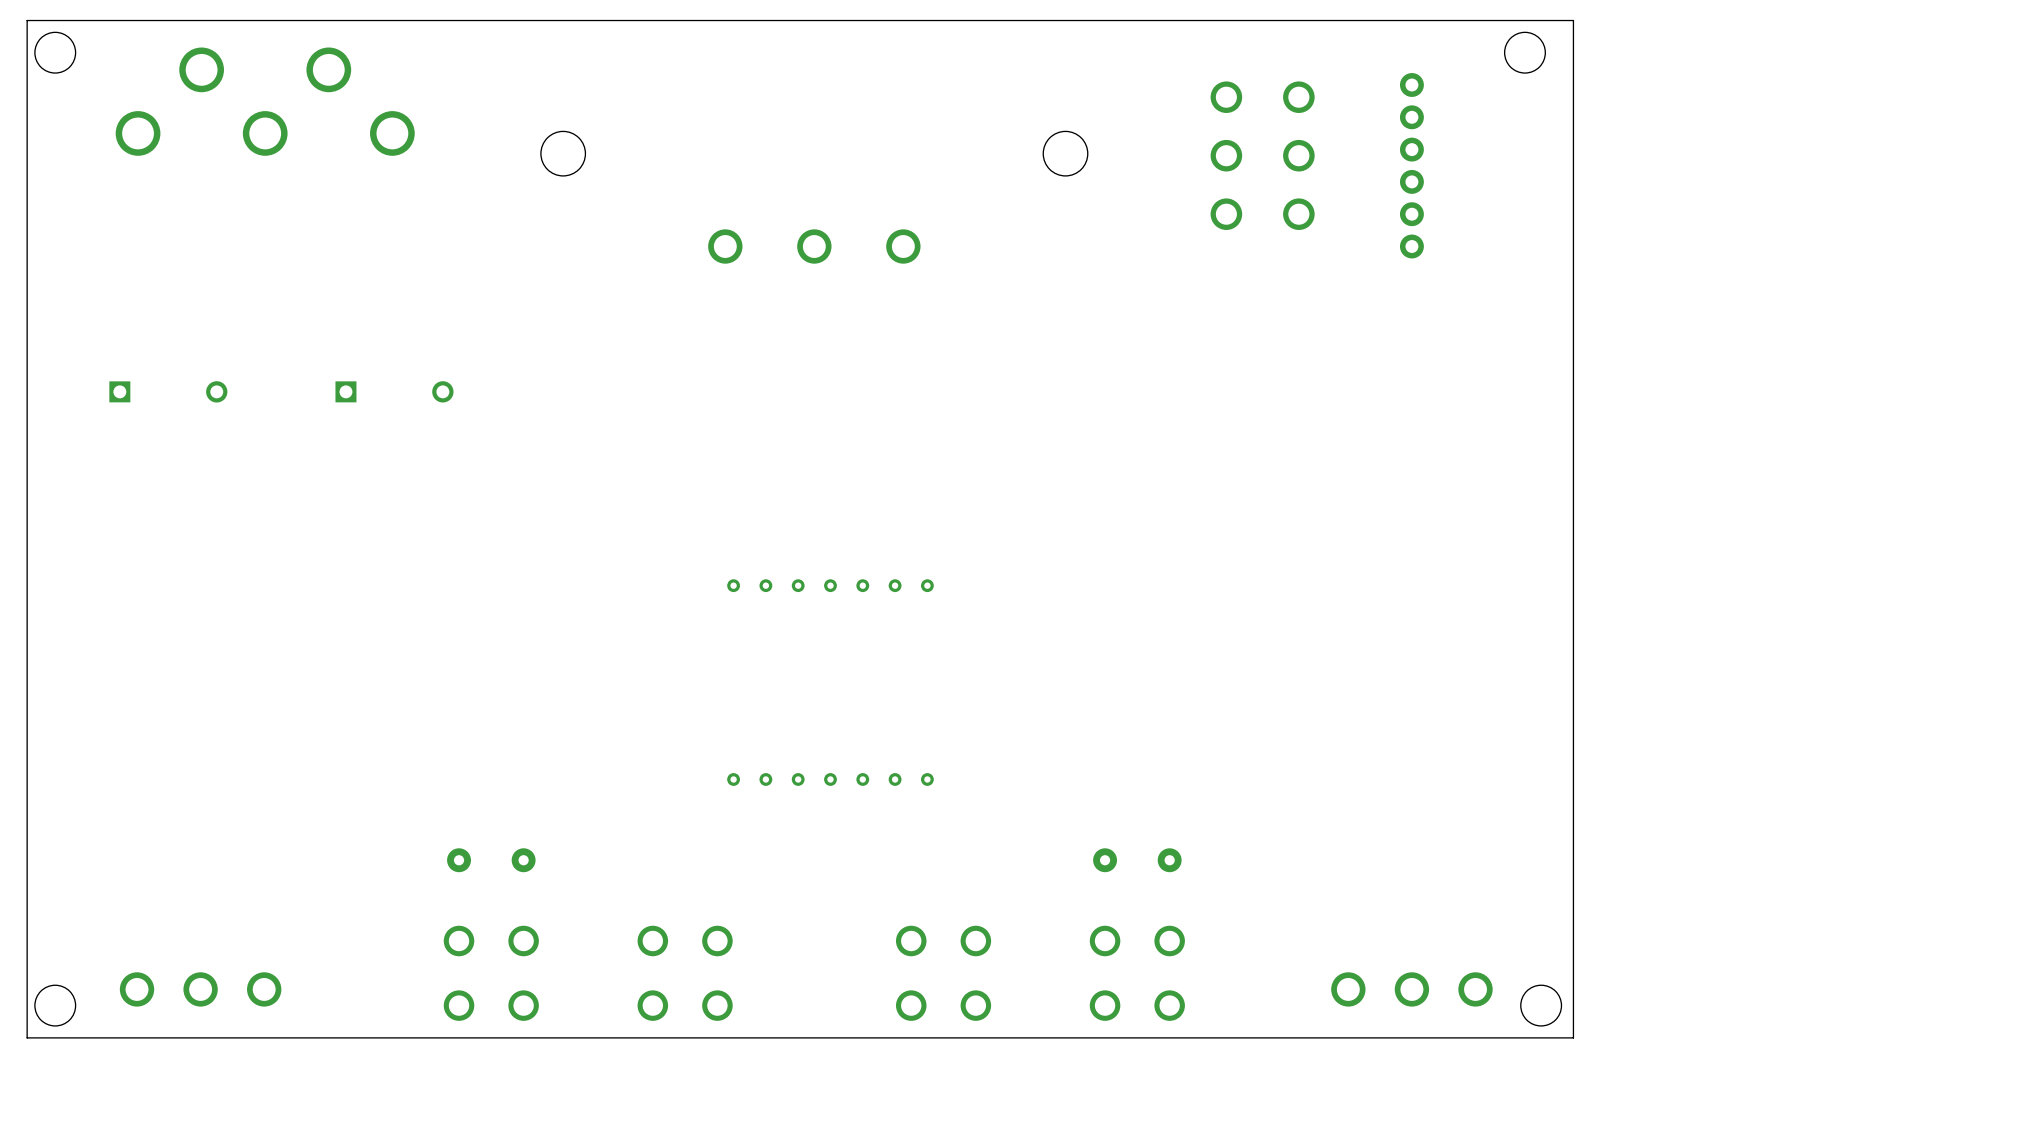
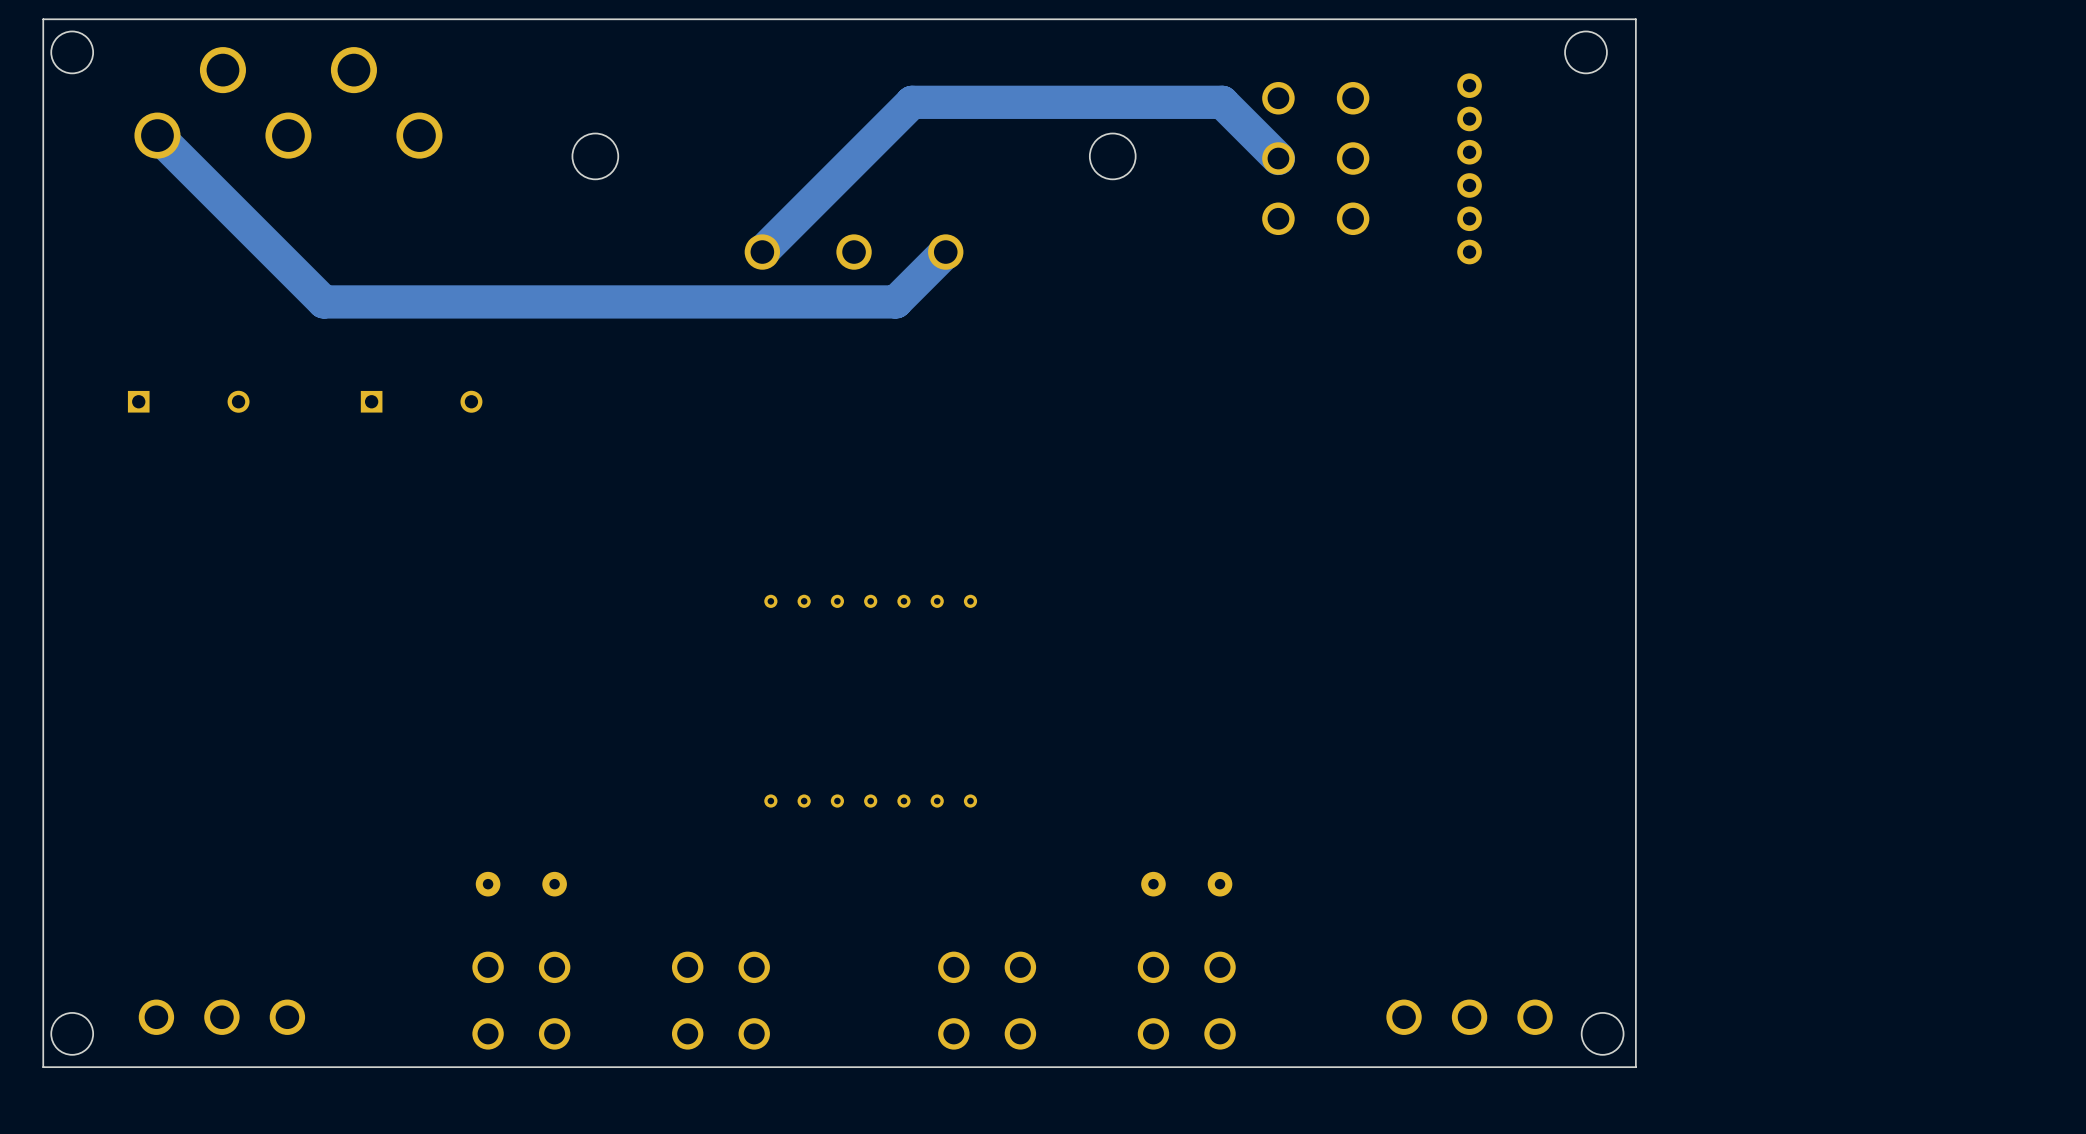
track: none -> (157, 135) (323, 301) (895, 301) (945, 252)
track: none -> (1278, 158) (1222, 102) (912, 102) (762, 252)

